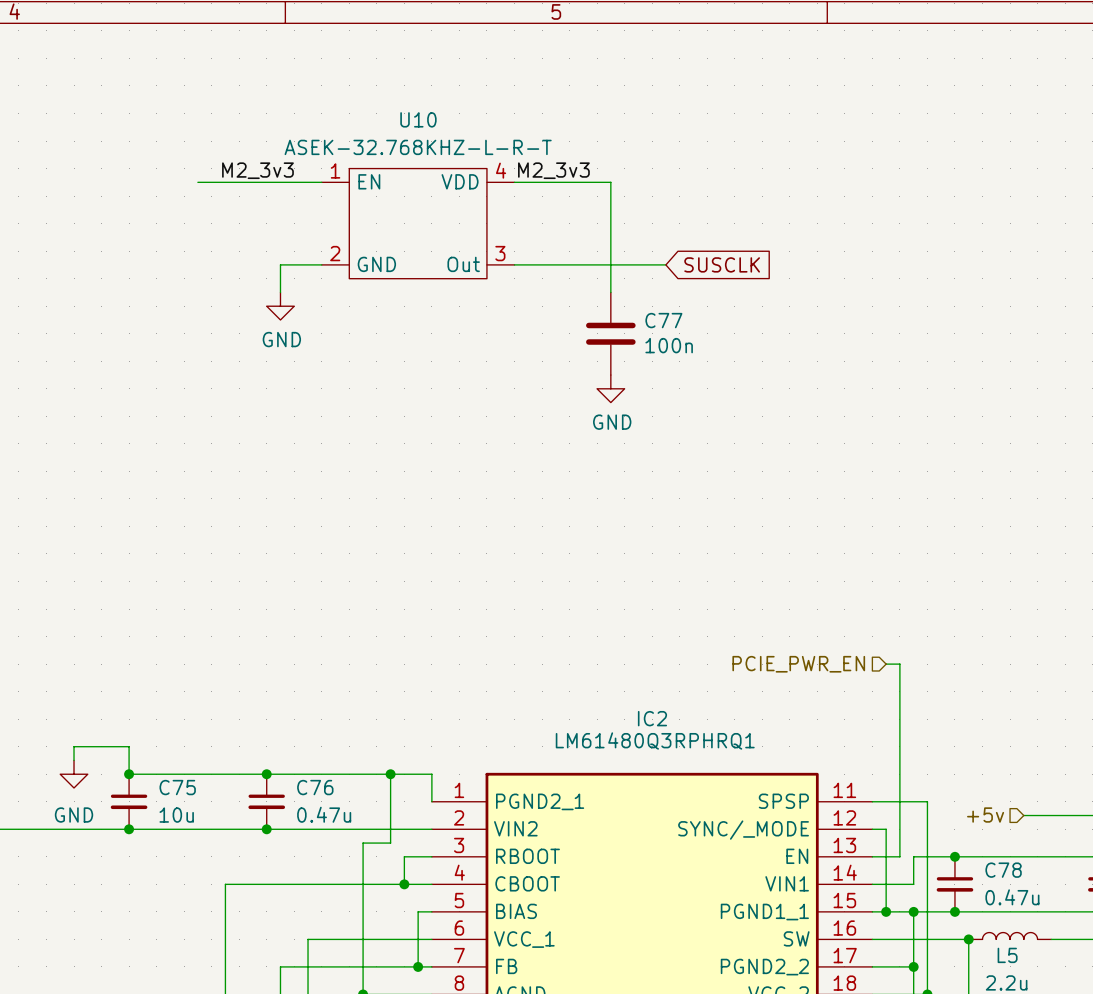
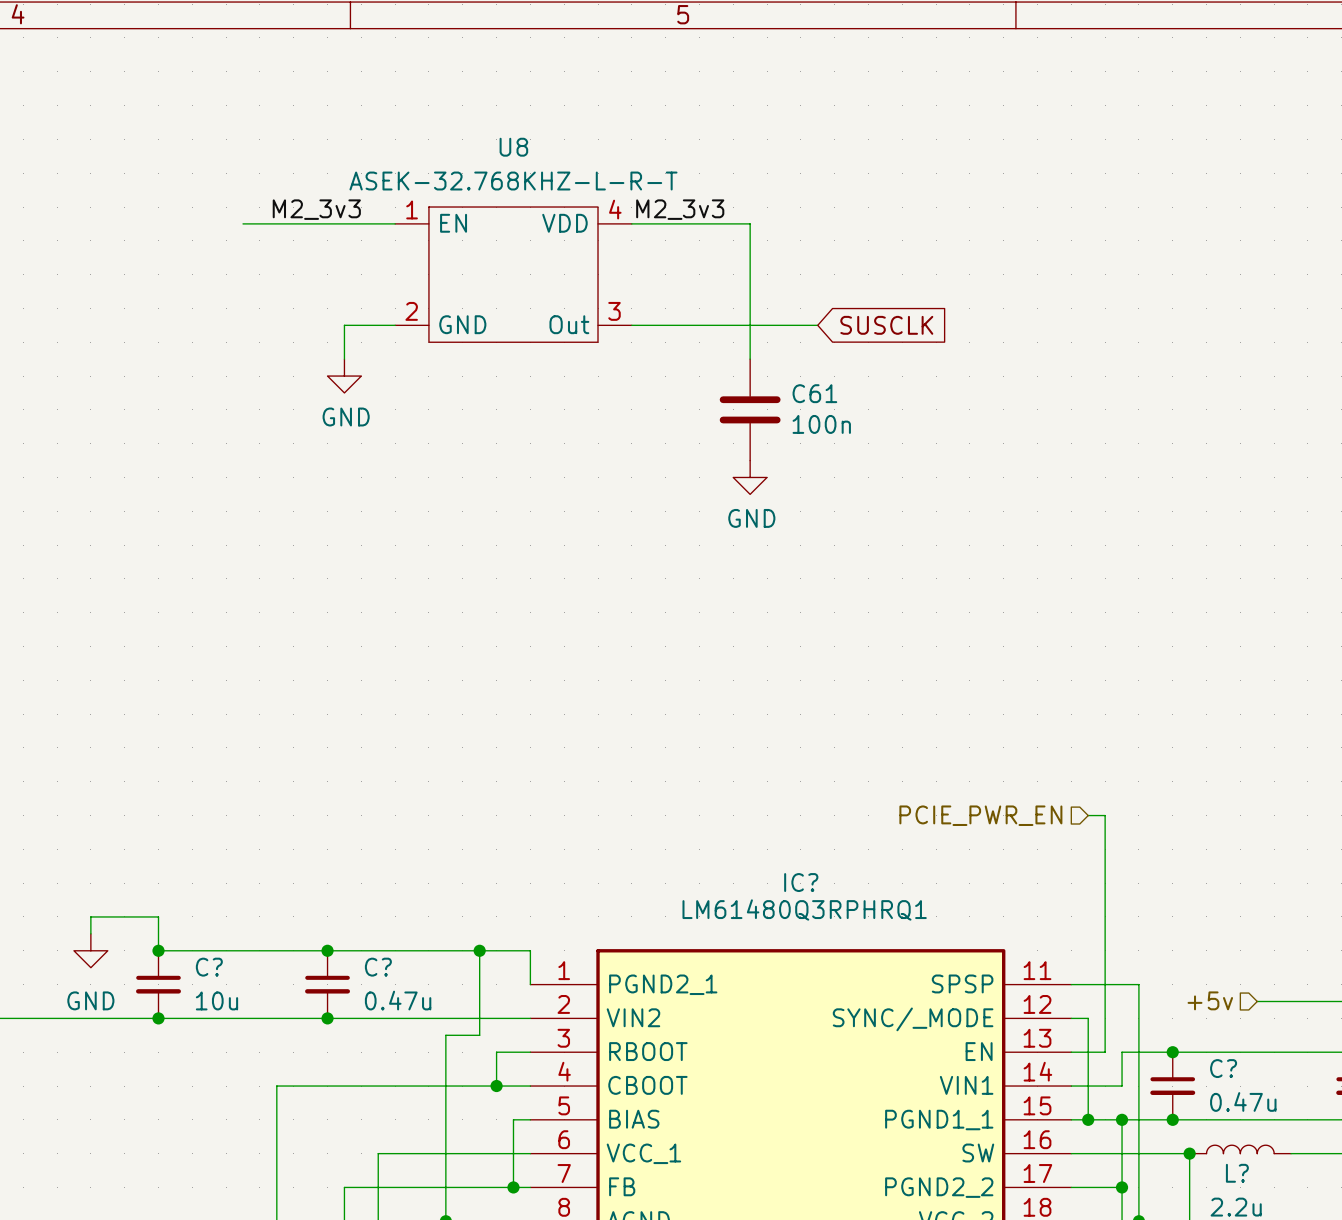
U10 name: U10 (418, 119) -> U8 (513, 147)
C77 name: C77 (663, 320) -> C61 (814, 393)
IC2 name: IC2 (652, 718) -> IC? (801, 882)
C75 name: C75 (177, 787) -> C? (209, 967)
C76 name: C76 (315, 787) -> C? (378, 967)
C78 name: C78 (1003, 870) -> C? (1223, 1068)
L5 name: L5 (1007, 955) -> L? (1237, 1173)

